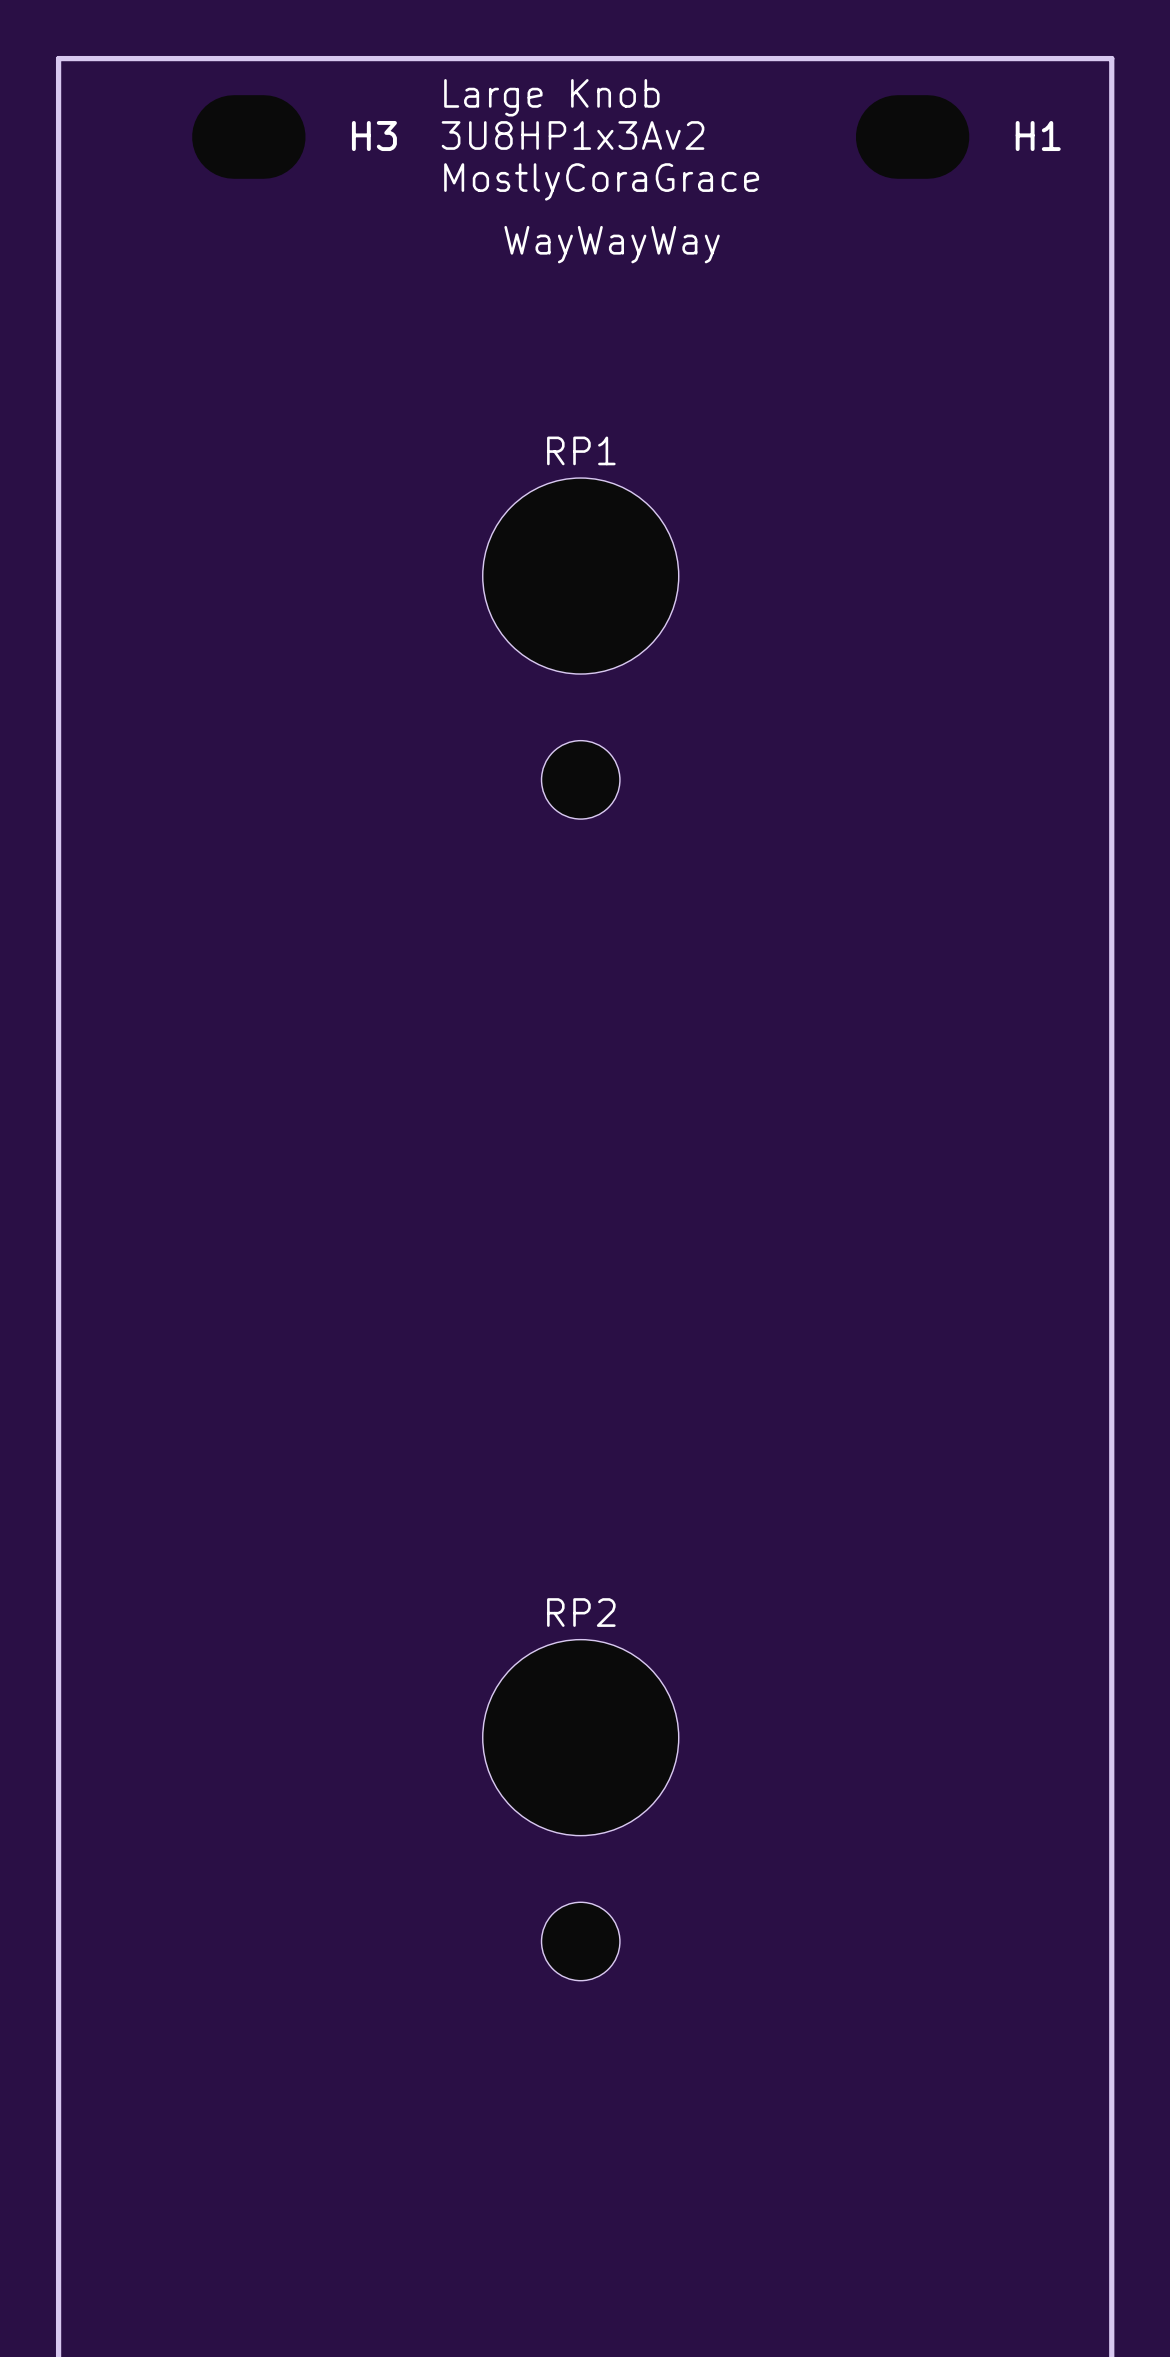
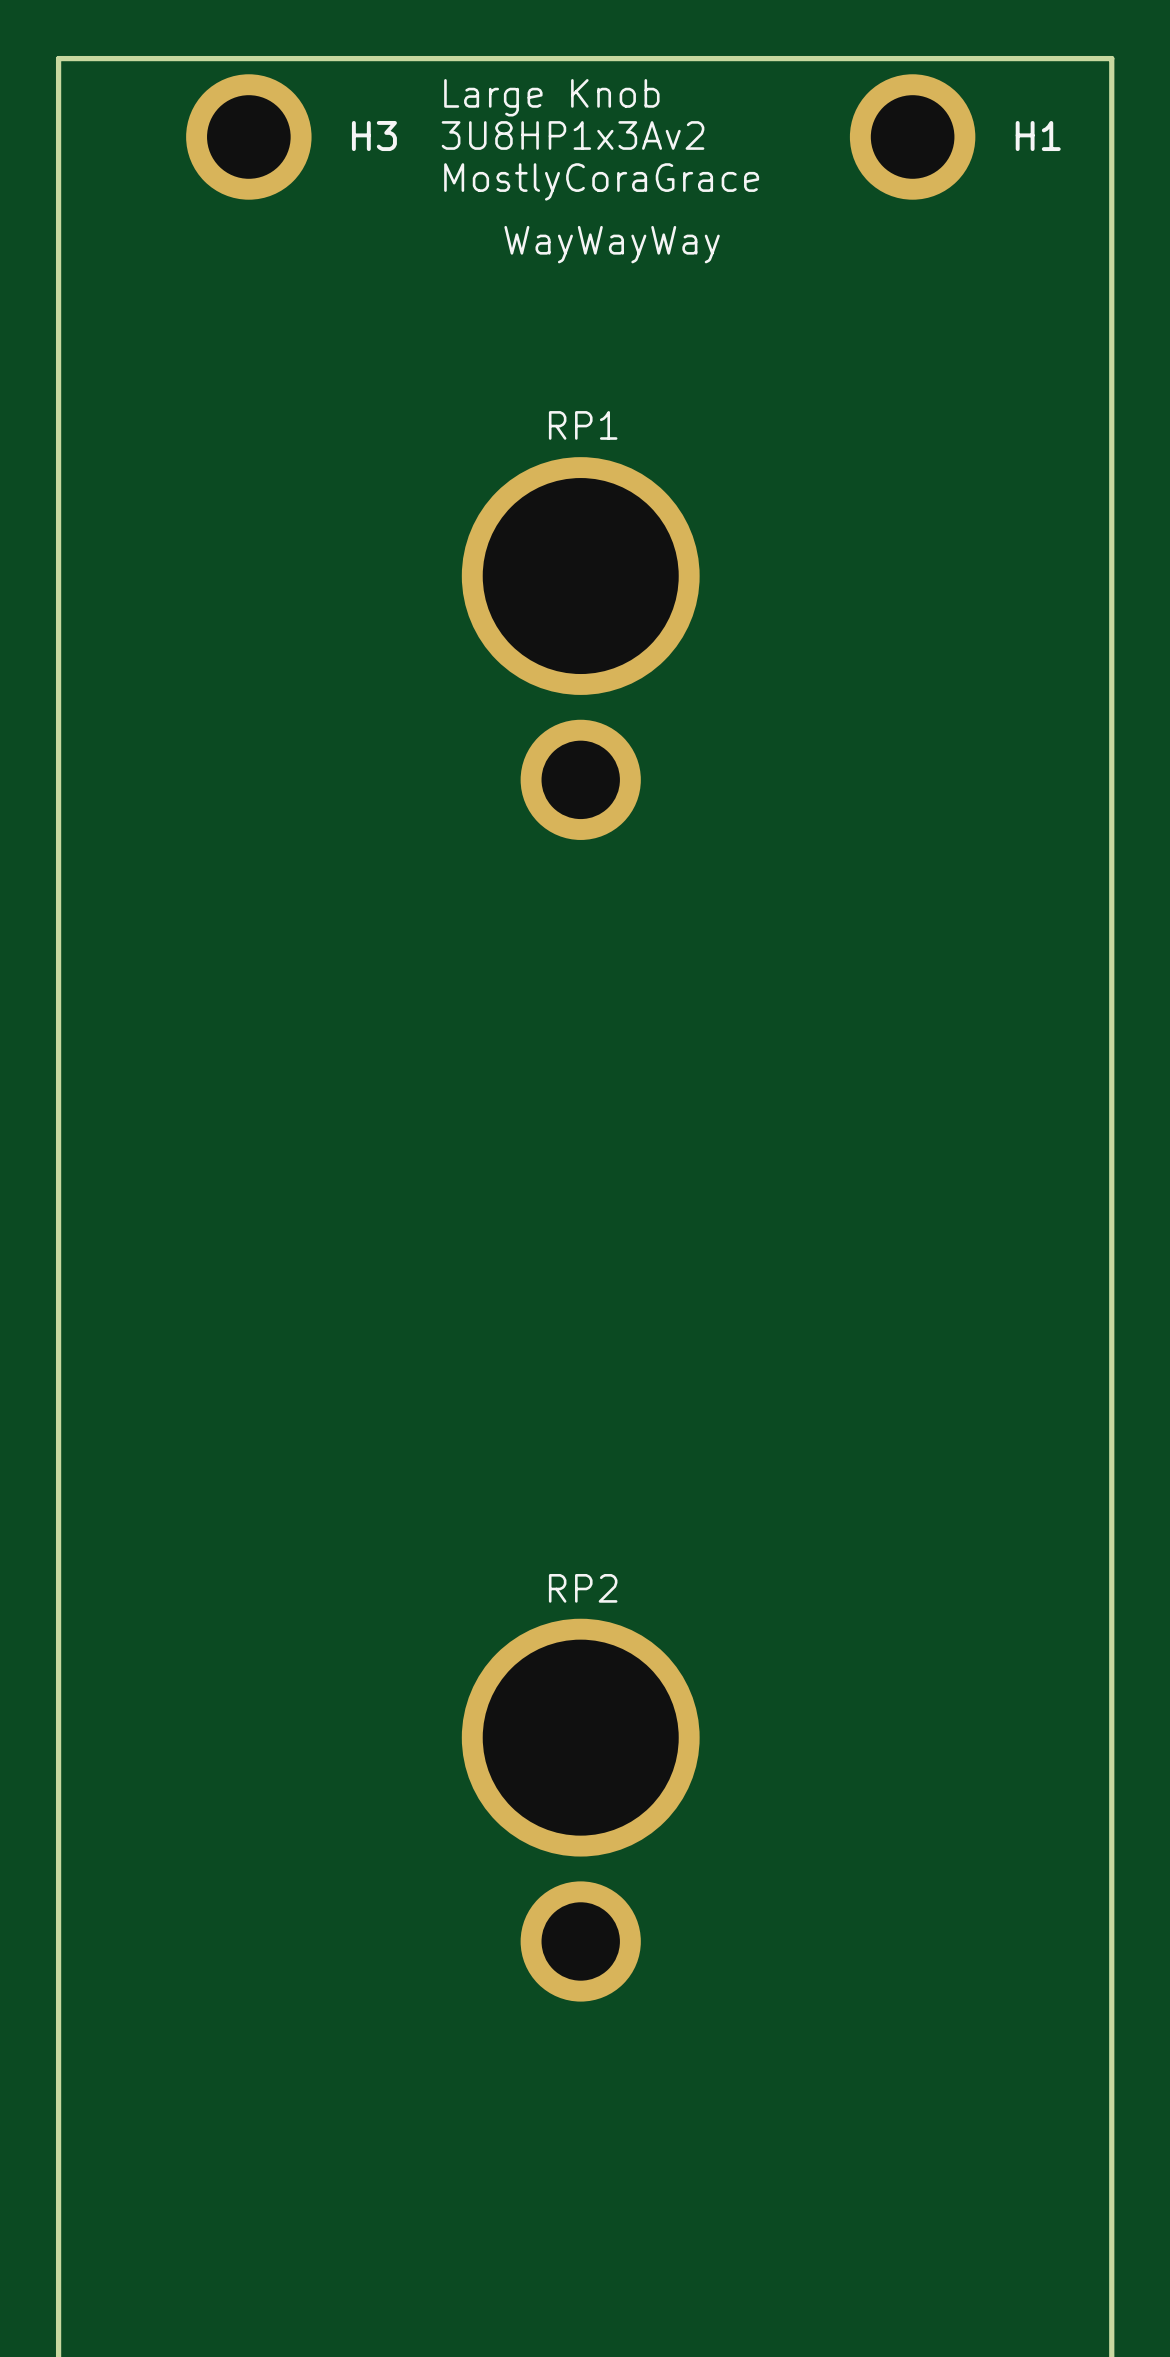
H3 footprint: [192, 95, 306, 179] -> [186, 74, 312, 200]
H1 footprint: [855, 95, 970, 179] -> [849, 74, 976, 200]
RP1 footprint: [482, 478, 679, 820] -> [461, 457, 700, 840]
RP2 footprint: [482, 1639, 679, 1981] -> [461, 1618, 700, 2002]

